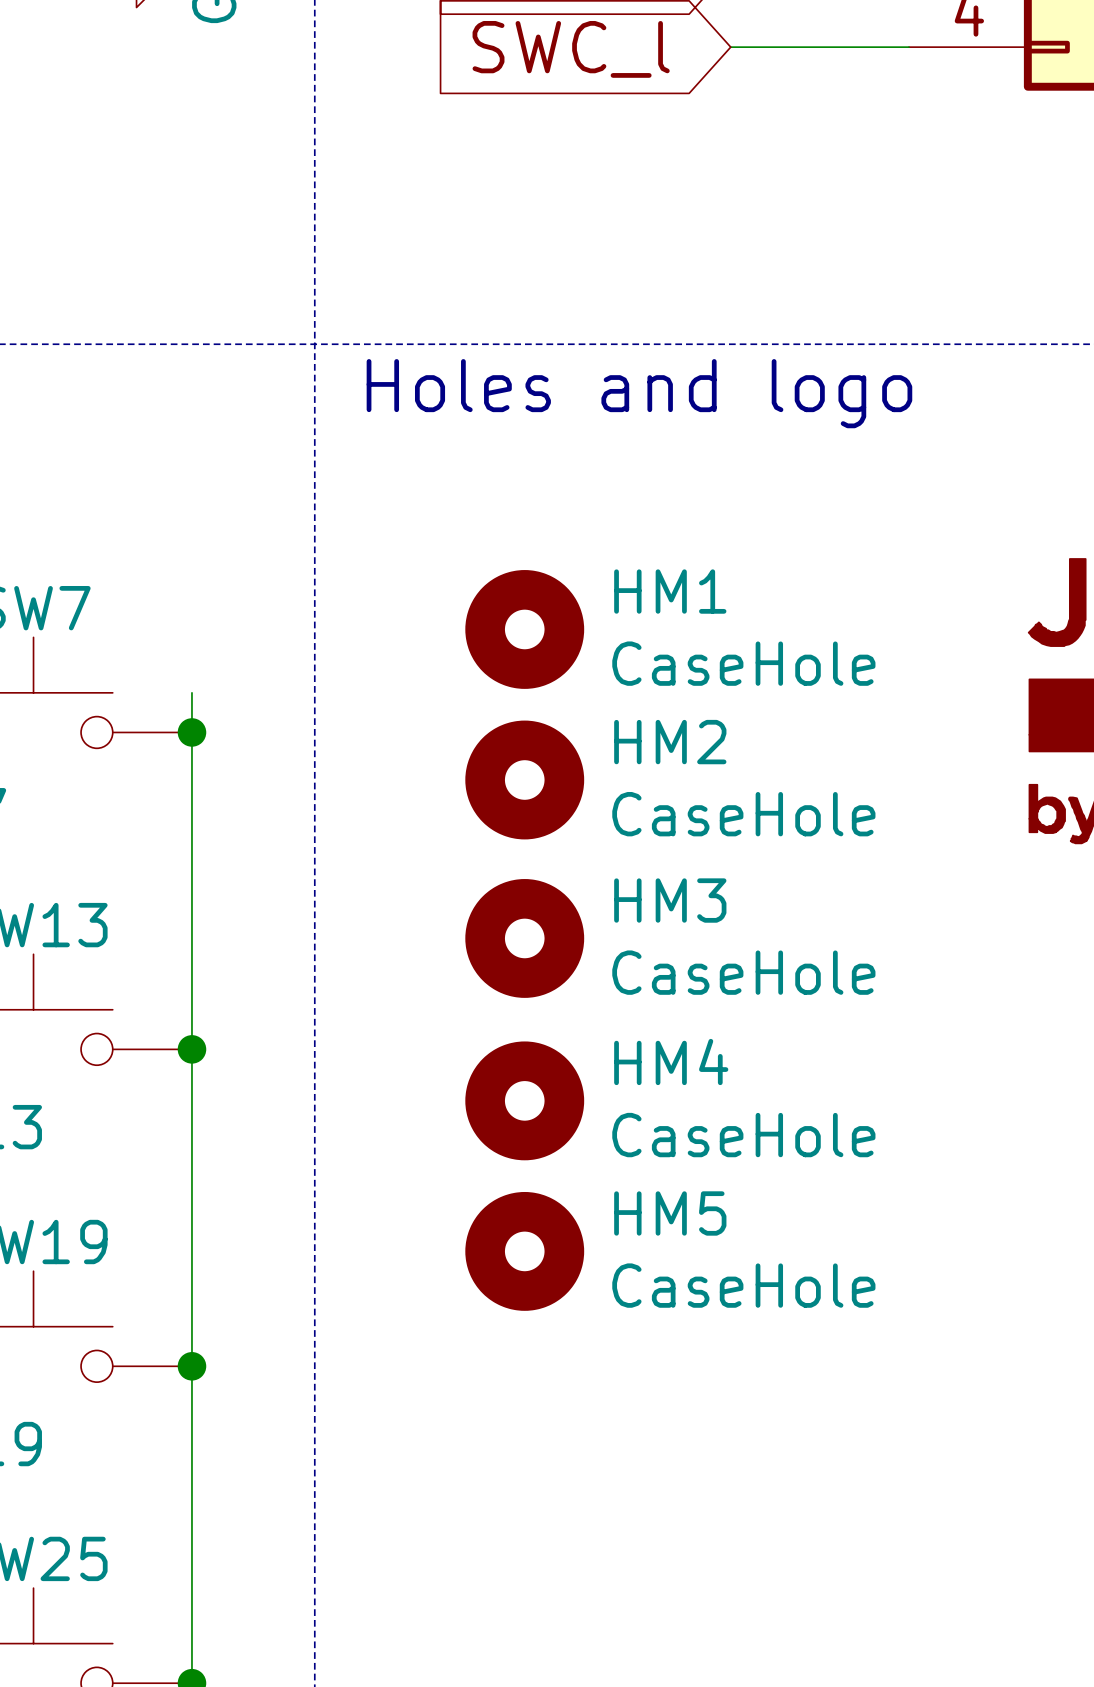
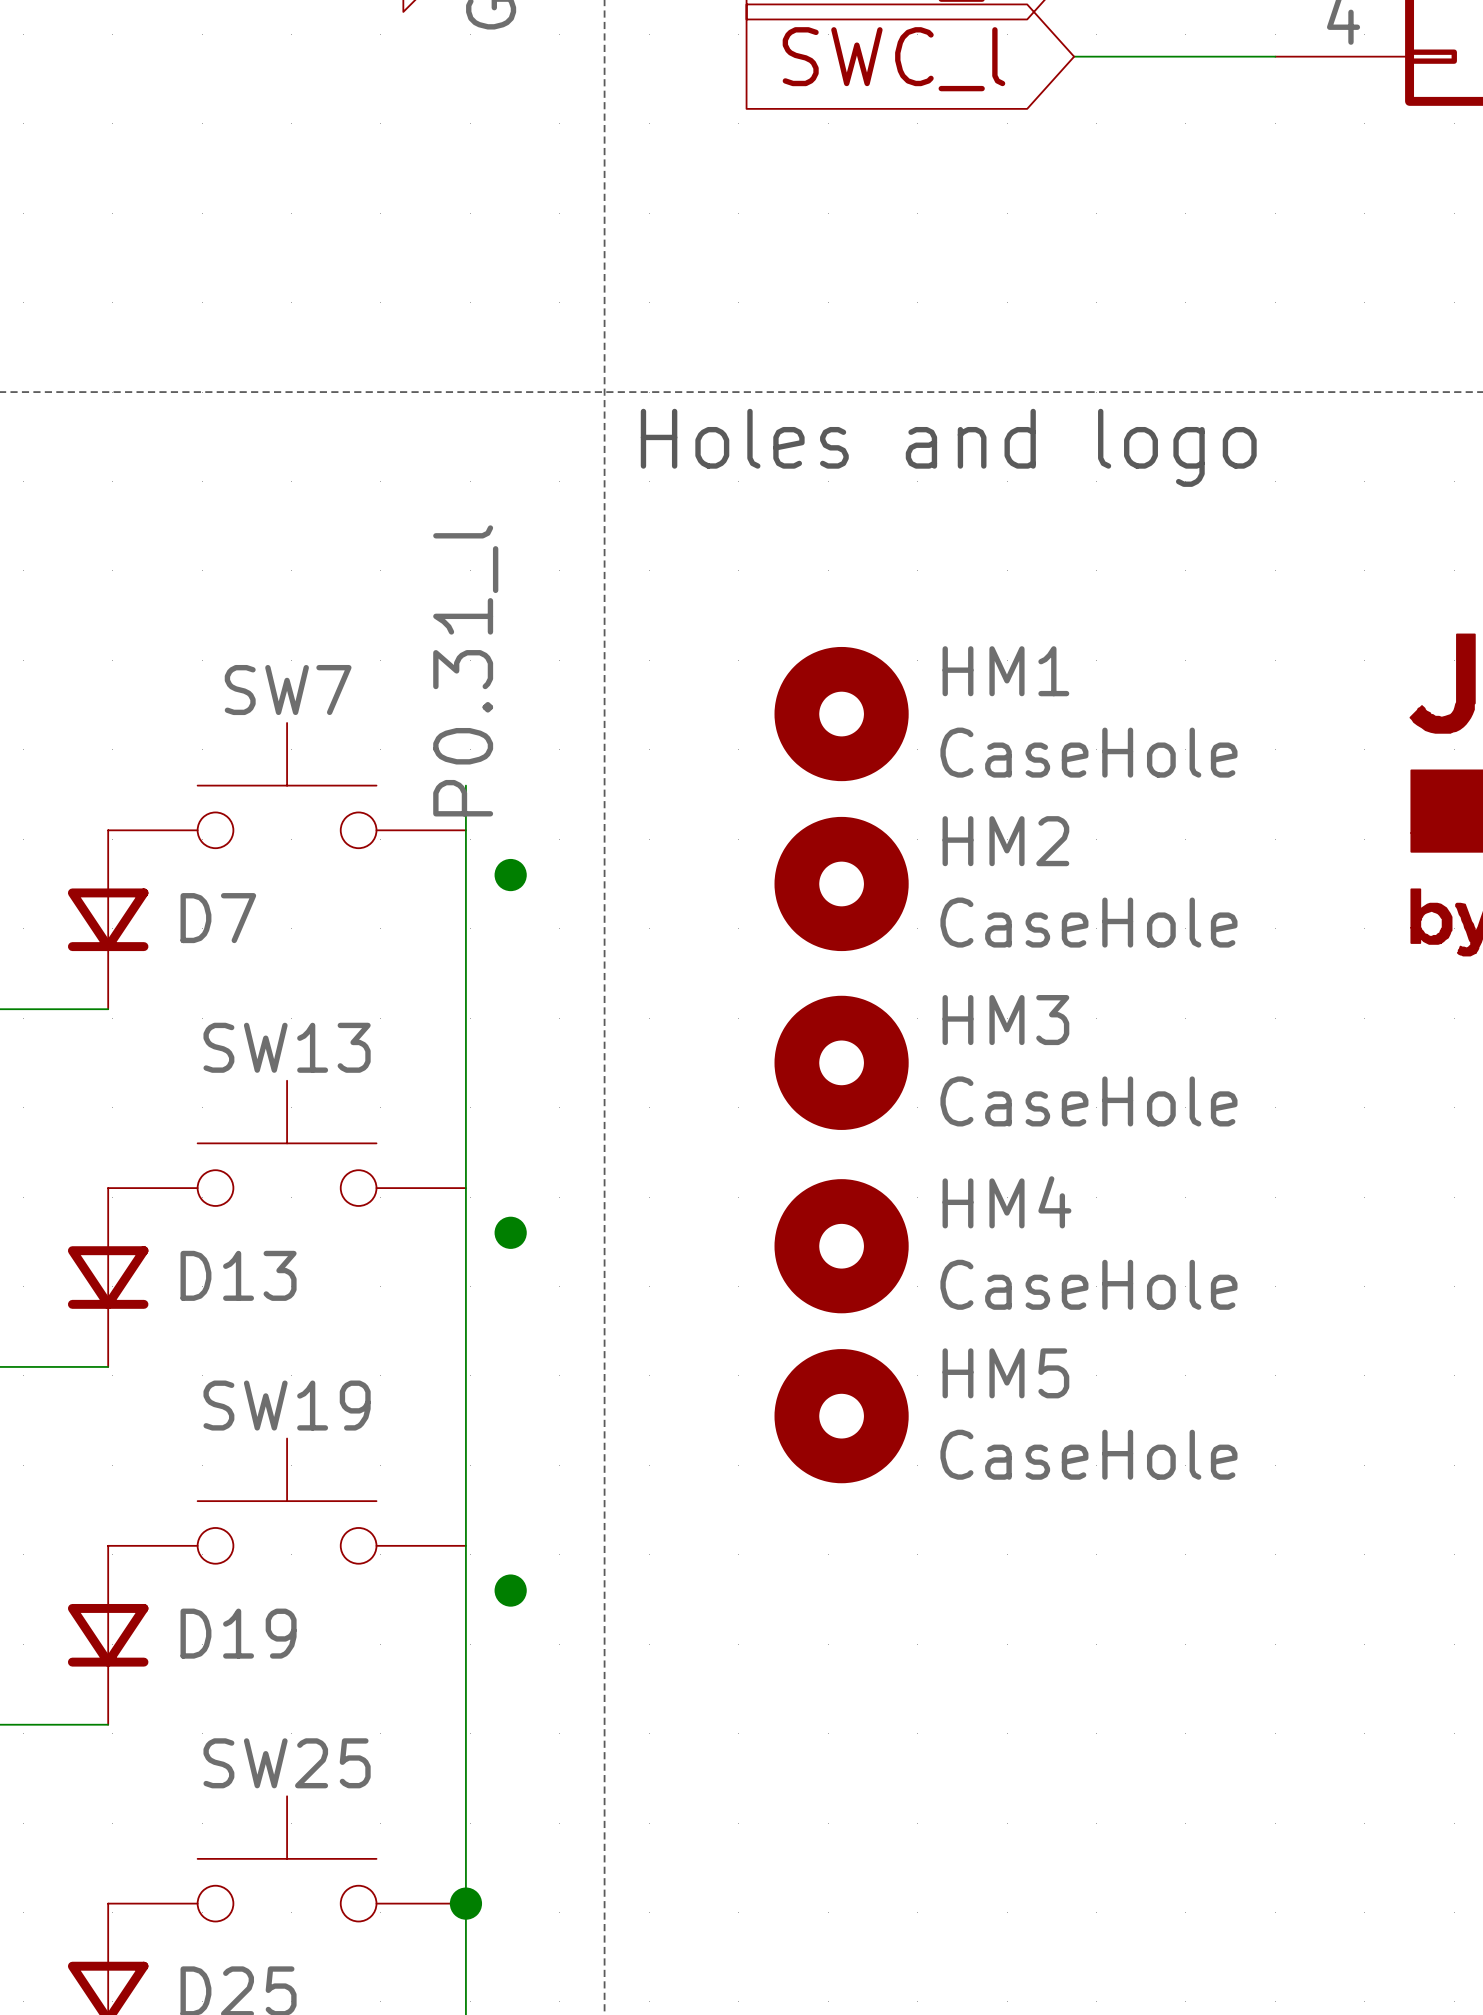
text position: Holes and logo (639, 393) -> Holes and logo (948, 447)
label: none -> P0.31_l (465, 670)
junction position: (191, 732) -> (510, 875)
junction position: (191, 1049) -> (510, 1232)
junction position: (191, 1366) -> (510, 1590)

